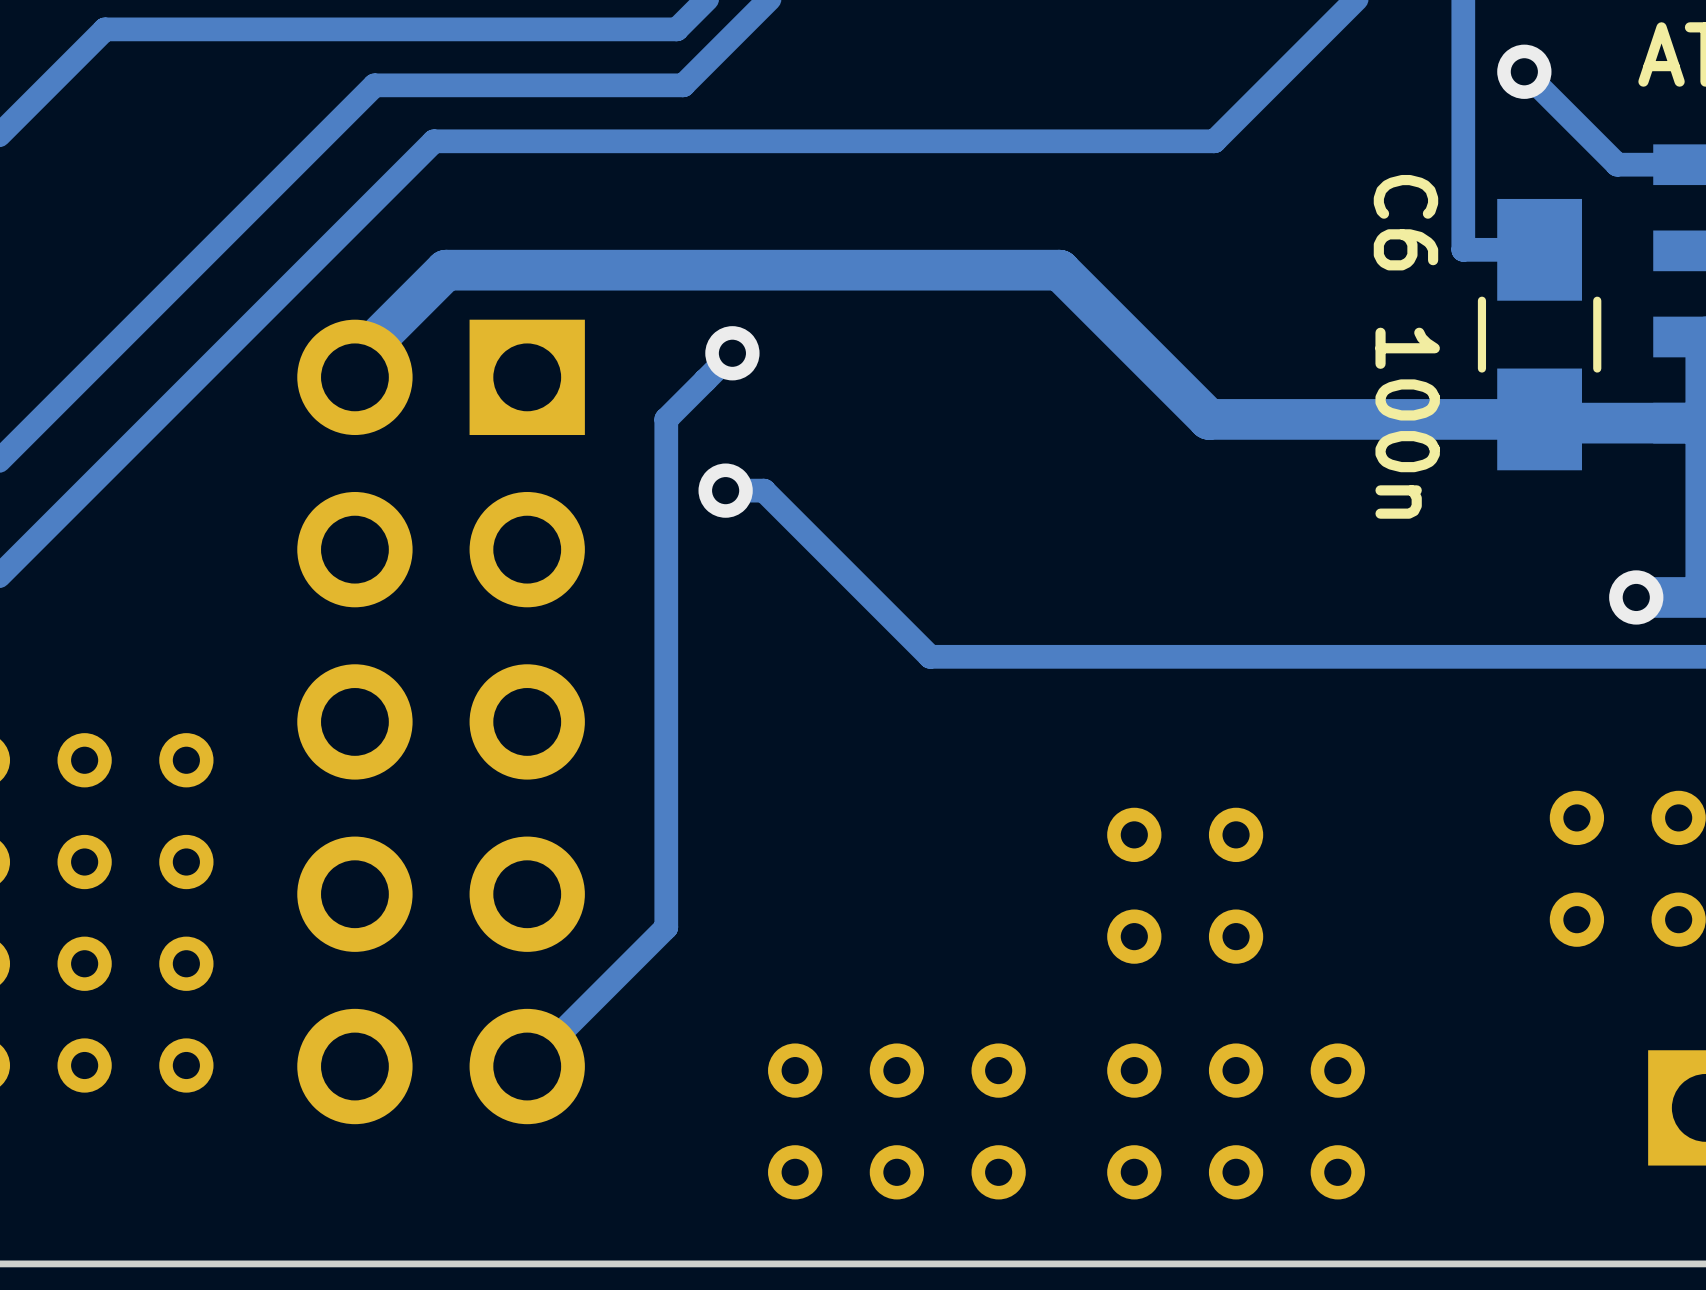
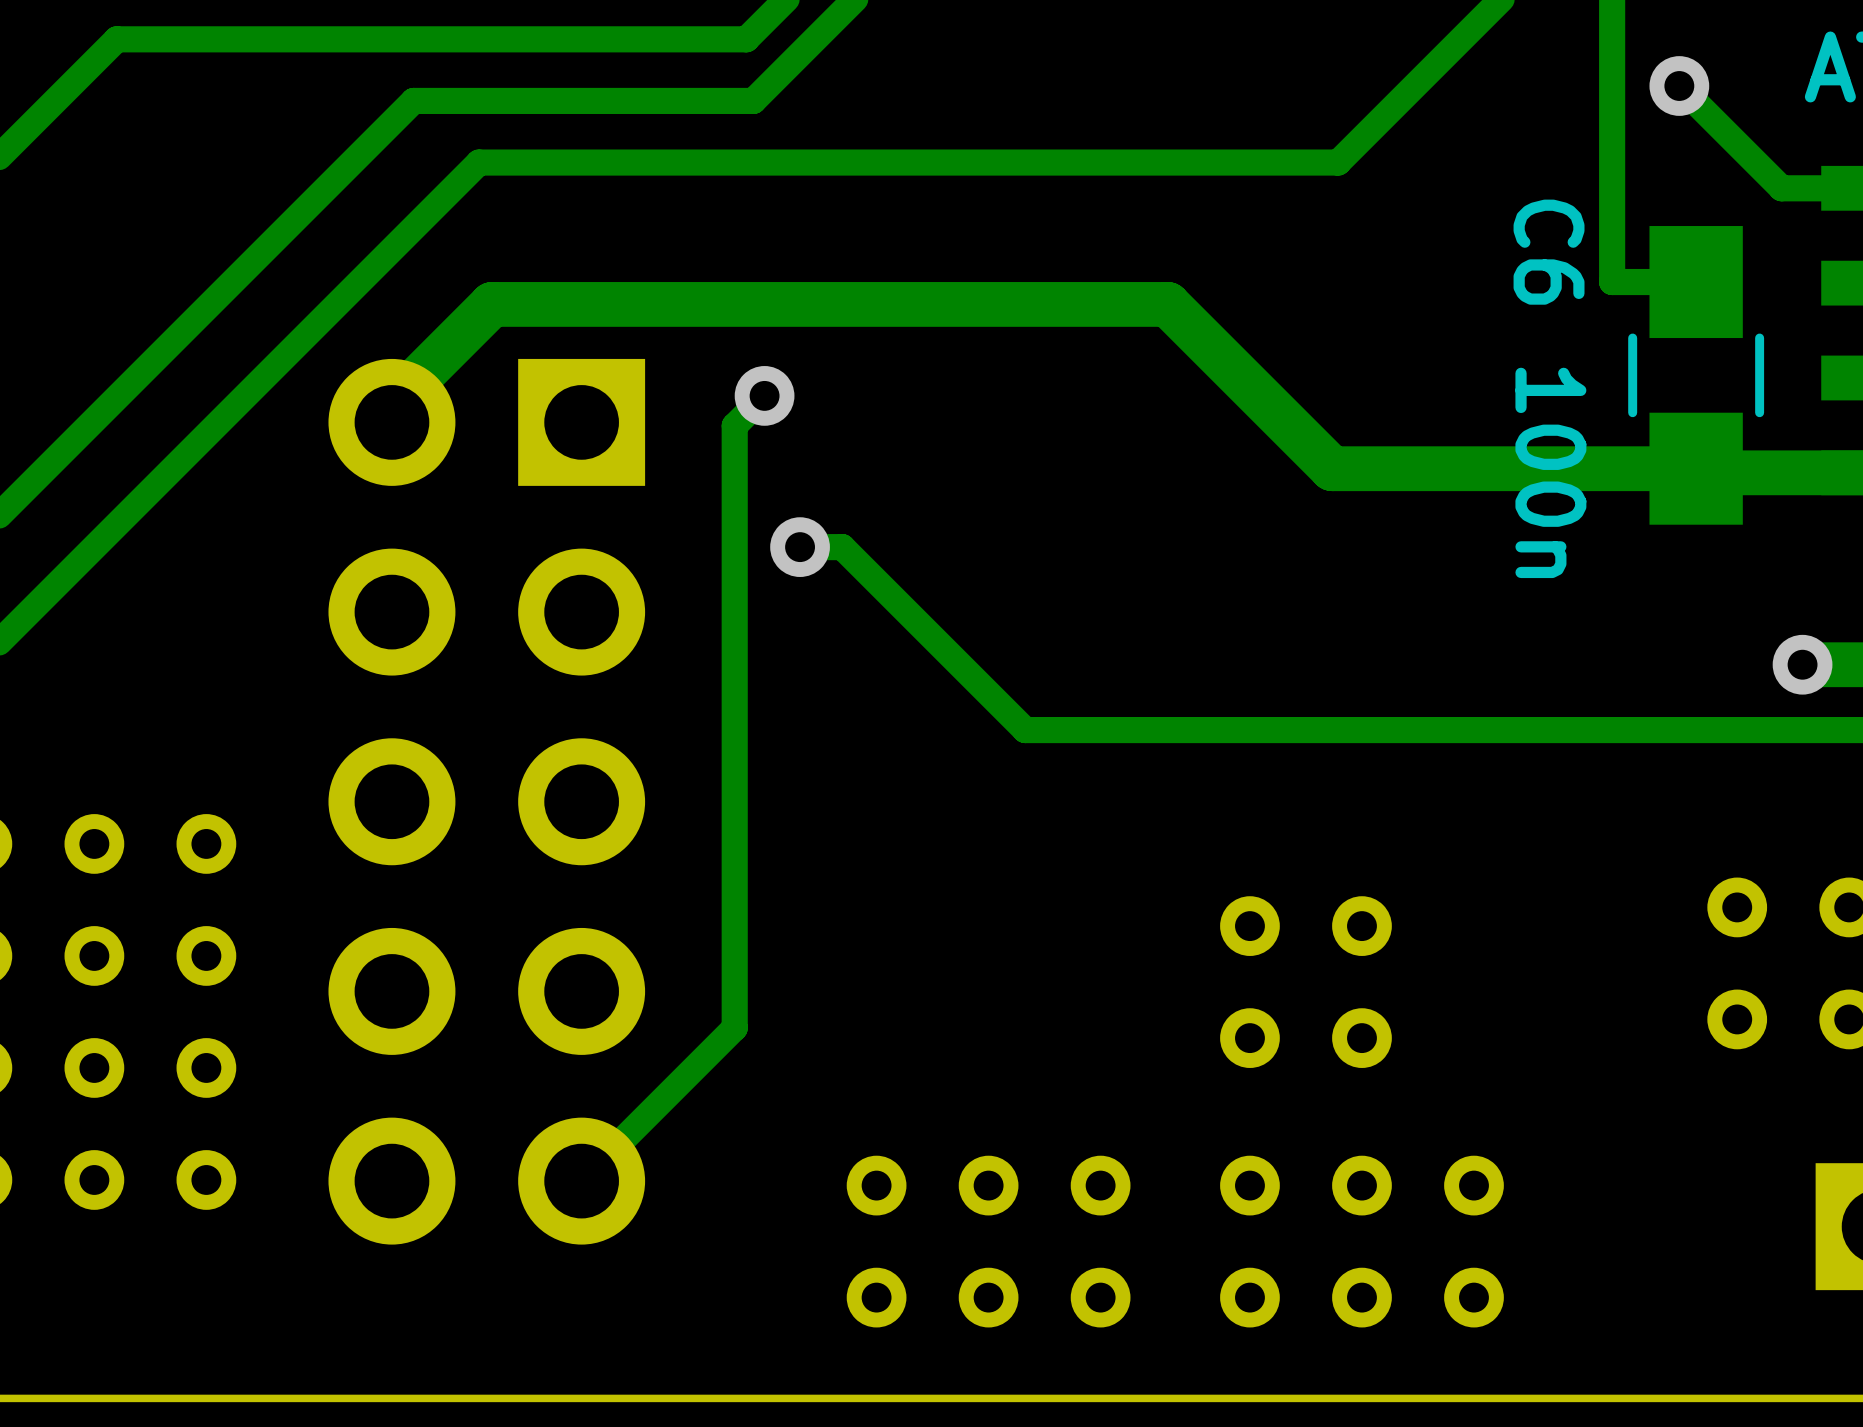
track: (732, 353) (666, 419) -> (764, 395) (734, 425) (734, 468)
via position: (732, 353) -> (764, 395)

